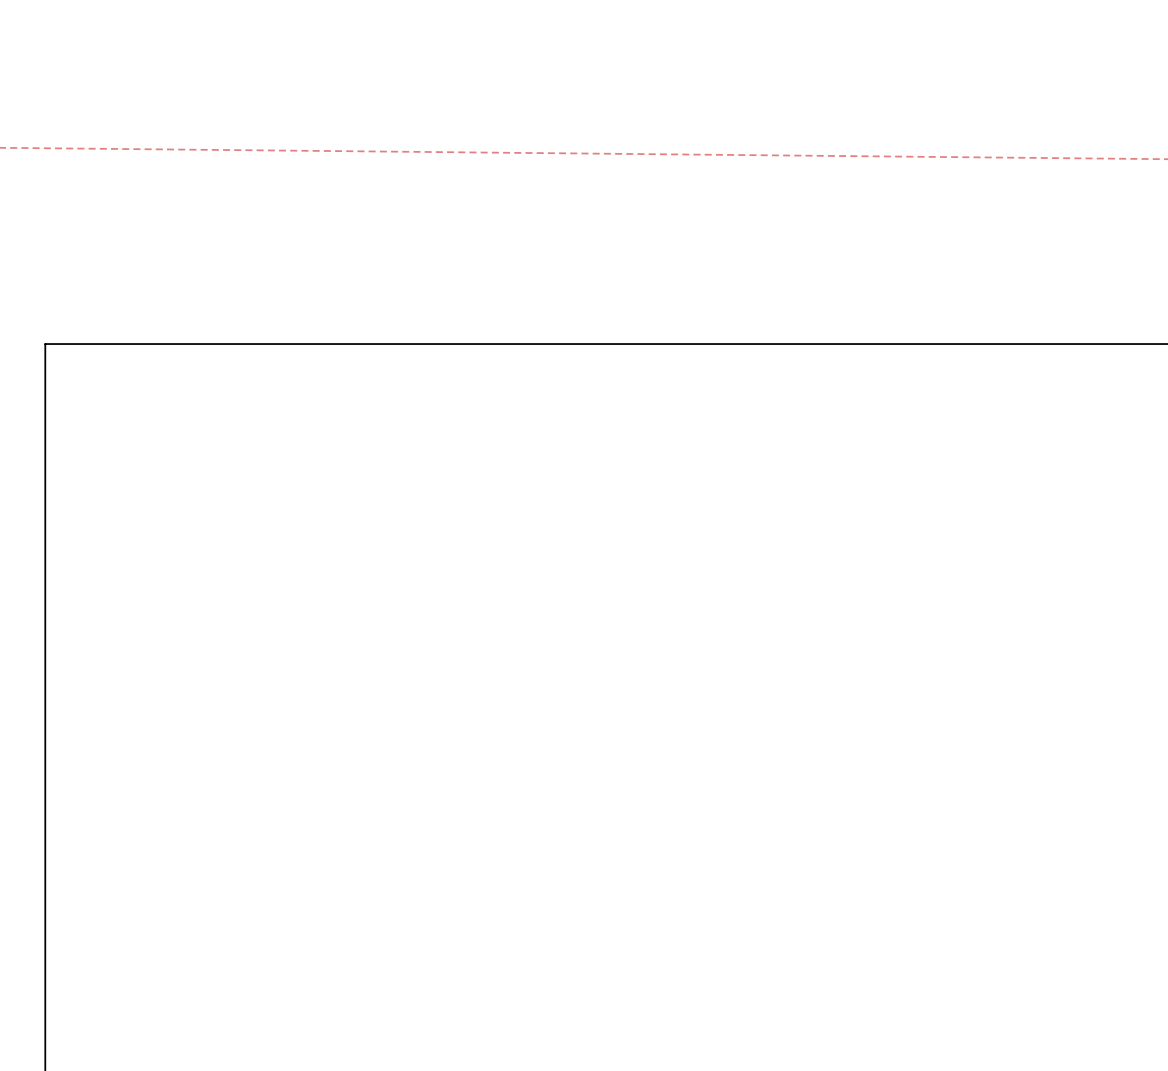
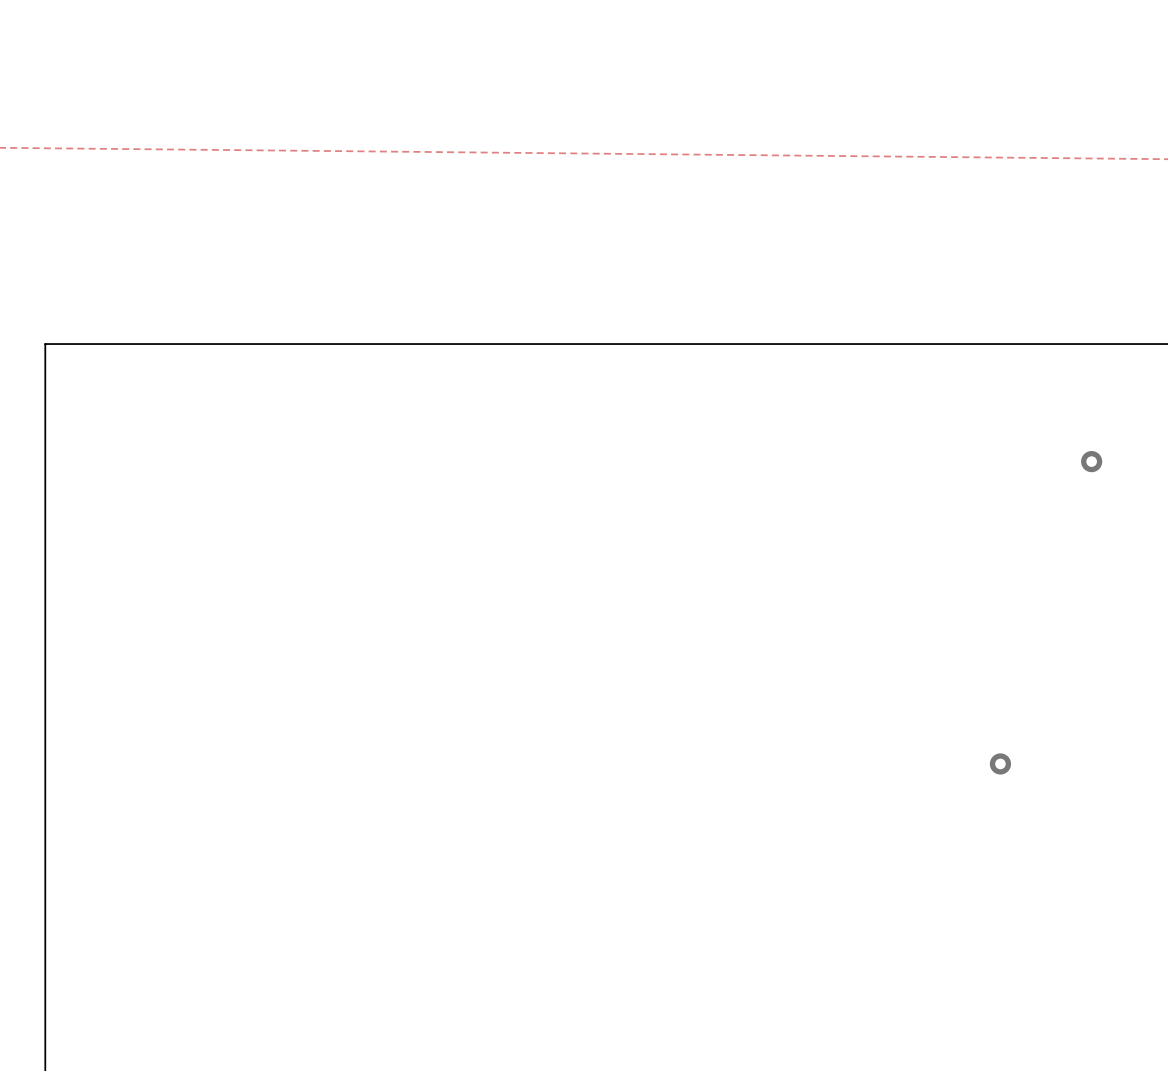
via: none -> (1091, 461)
via: none -> (1000, 763)

